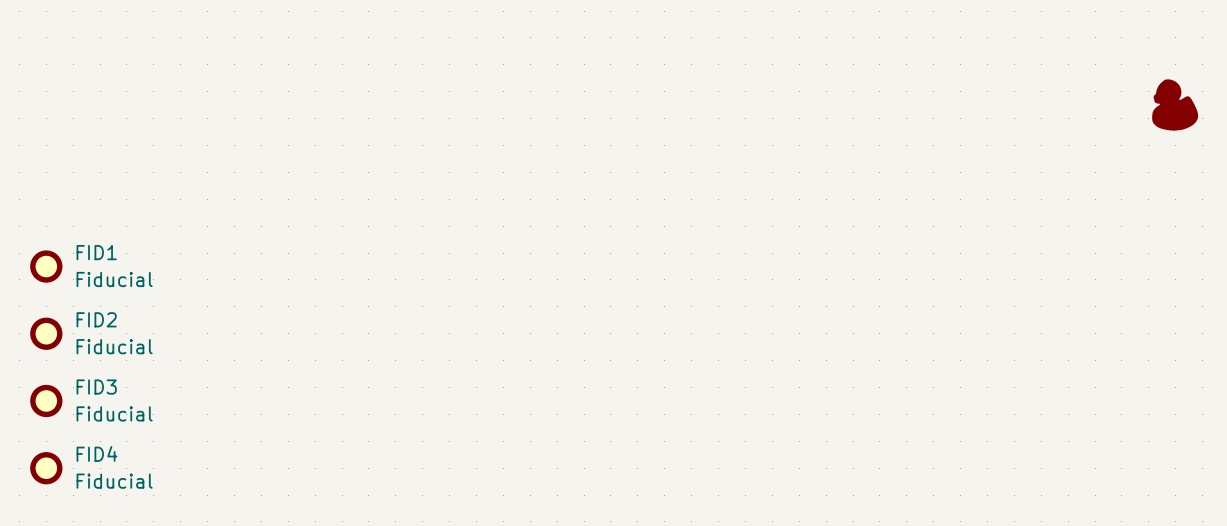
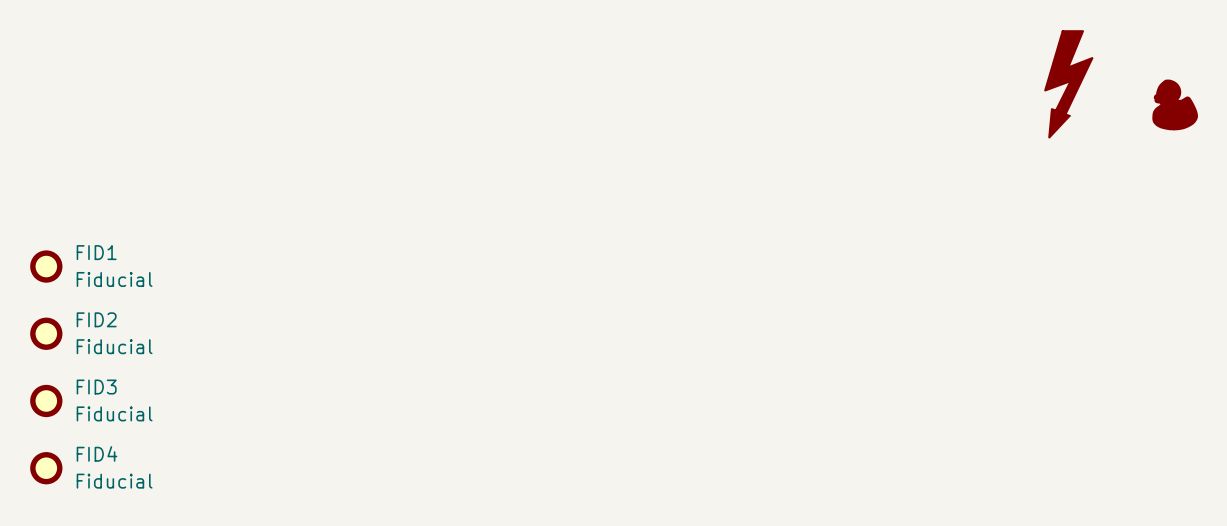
power symbol: none -> (1068, 84)

